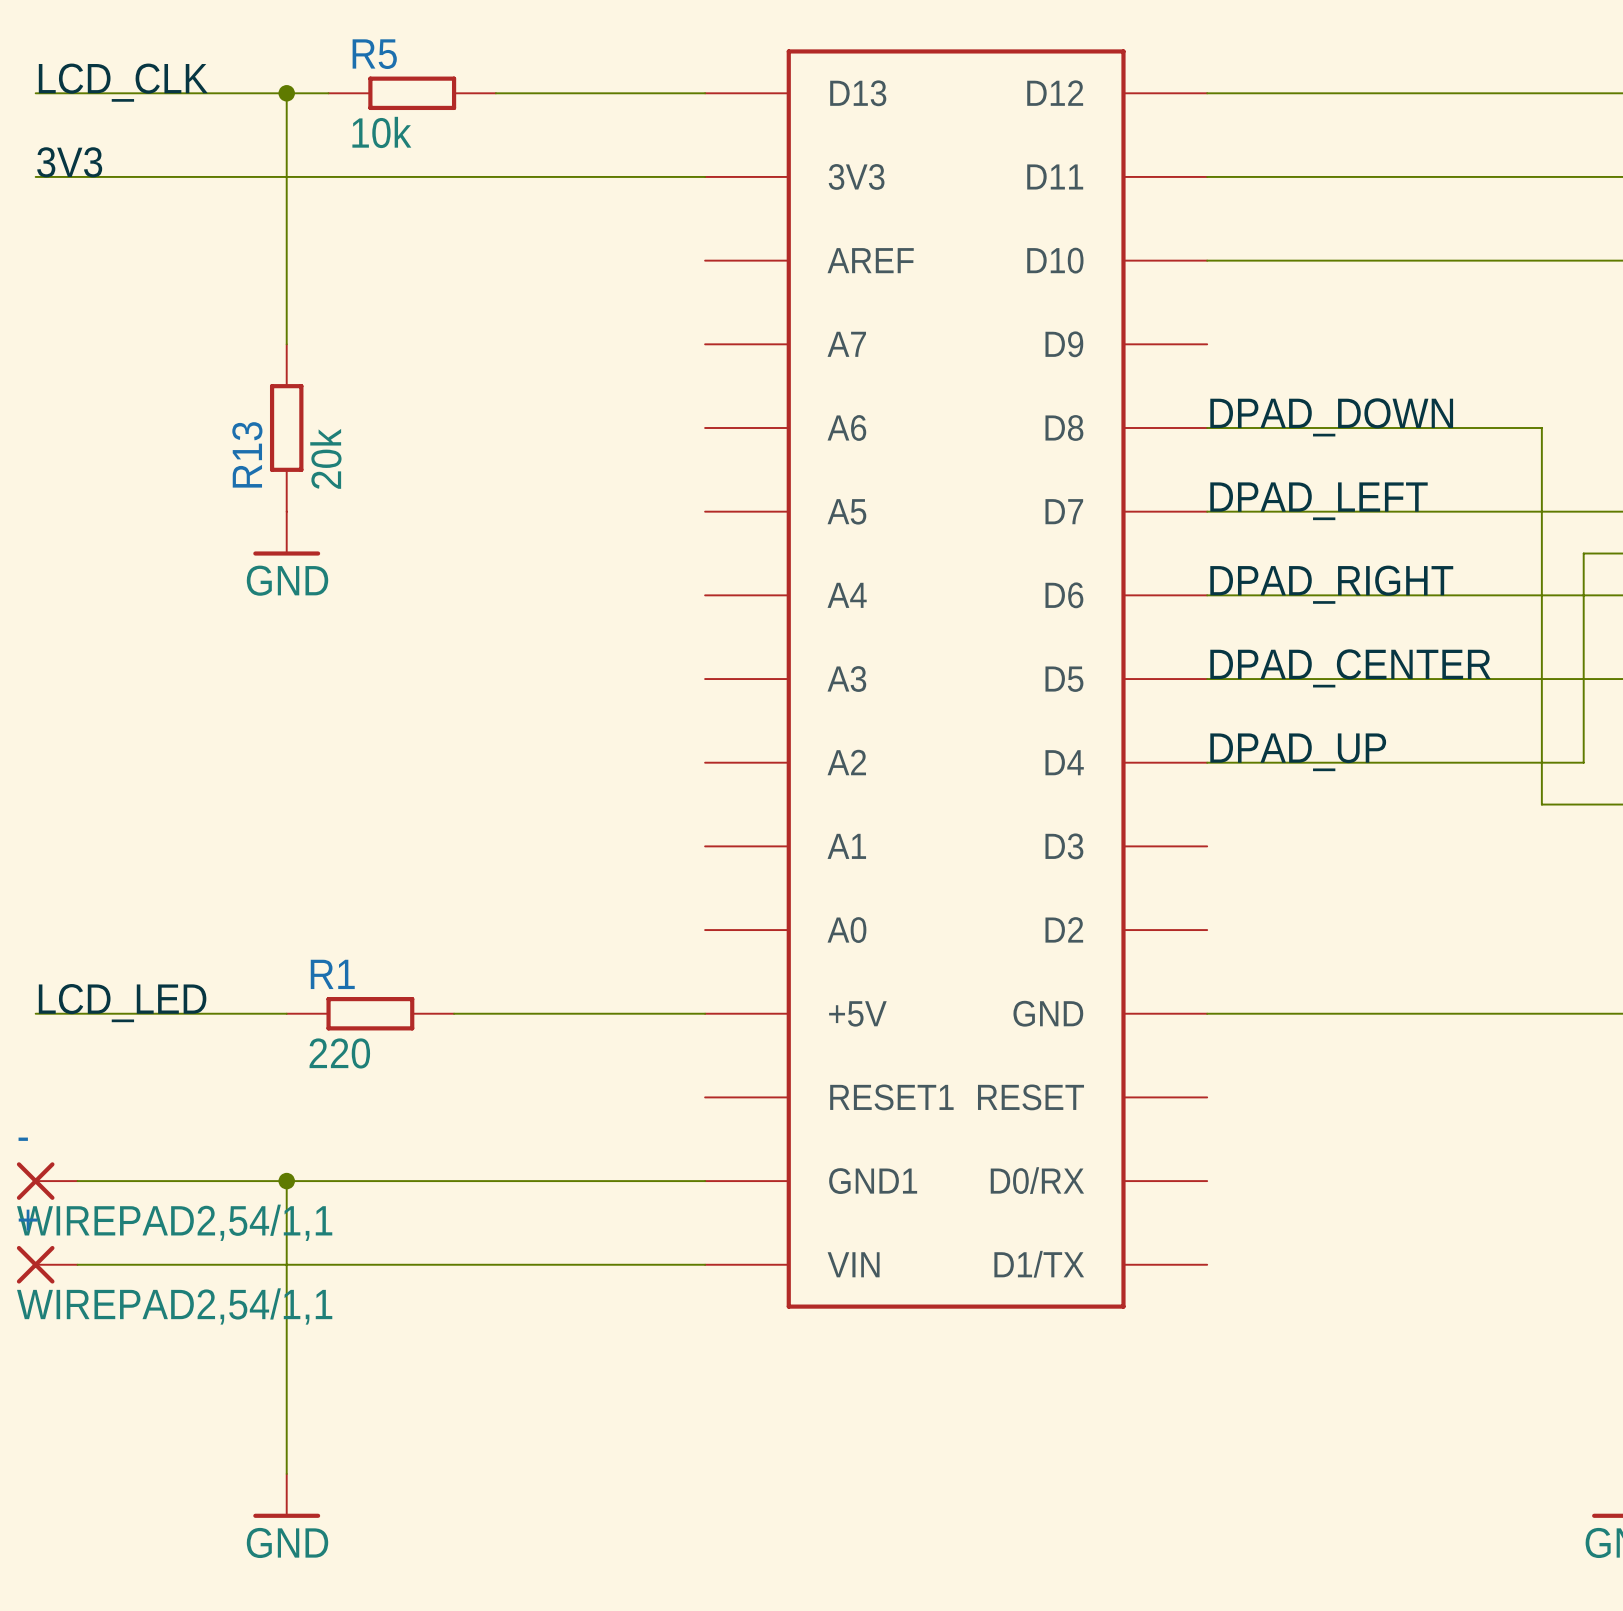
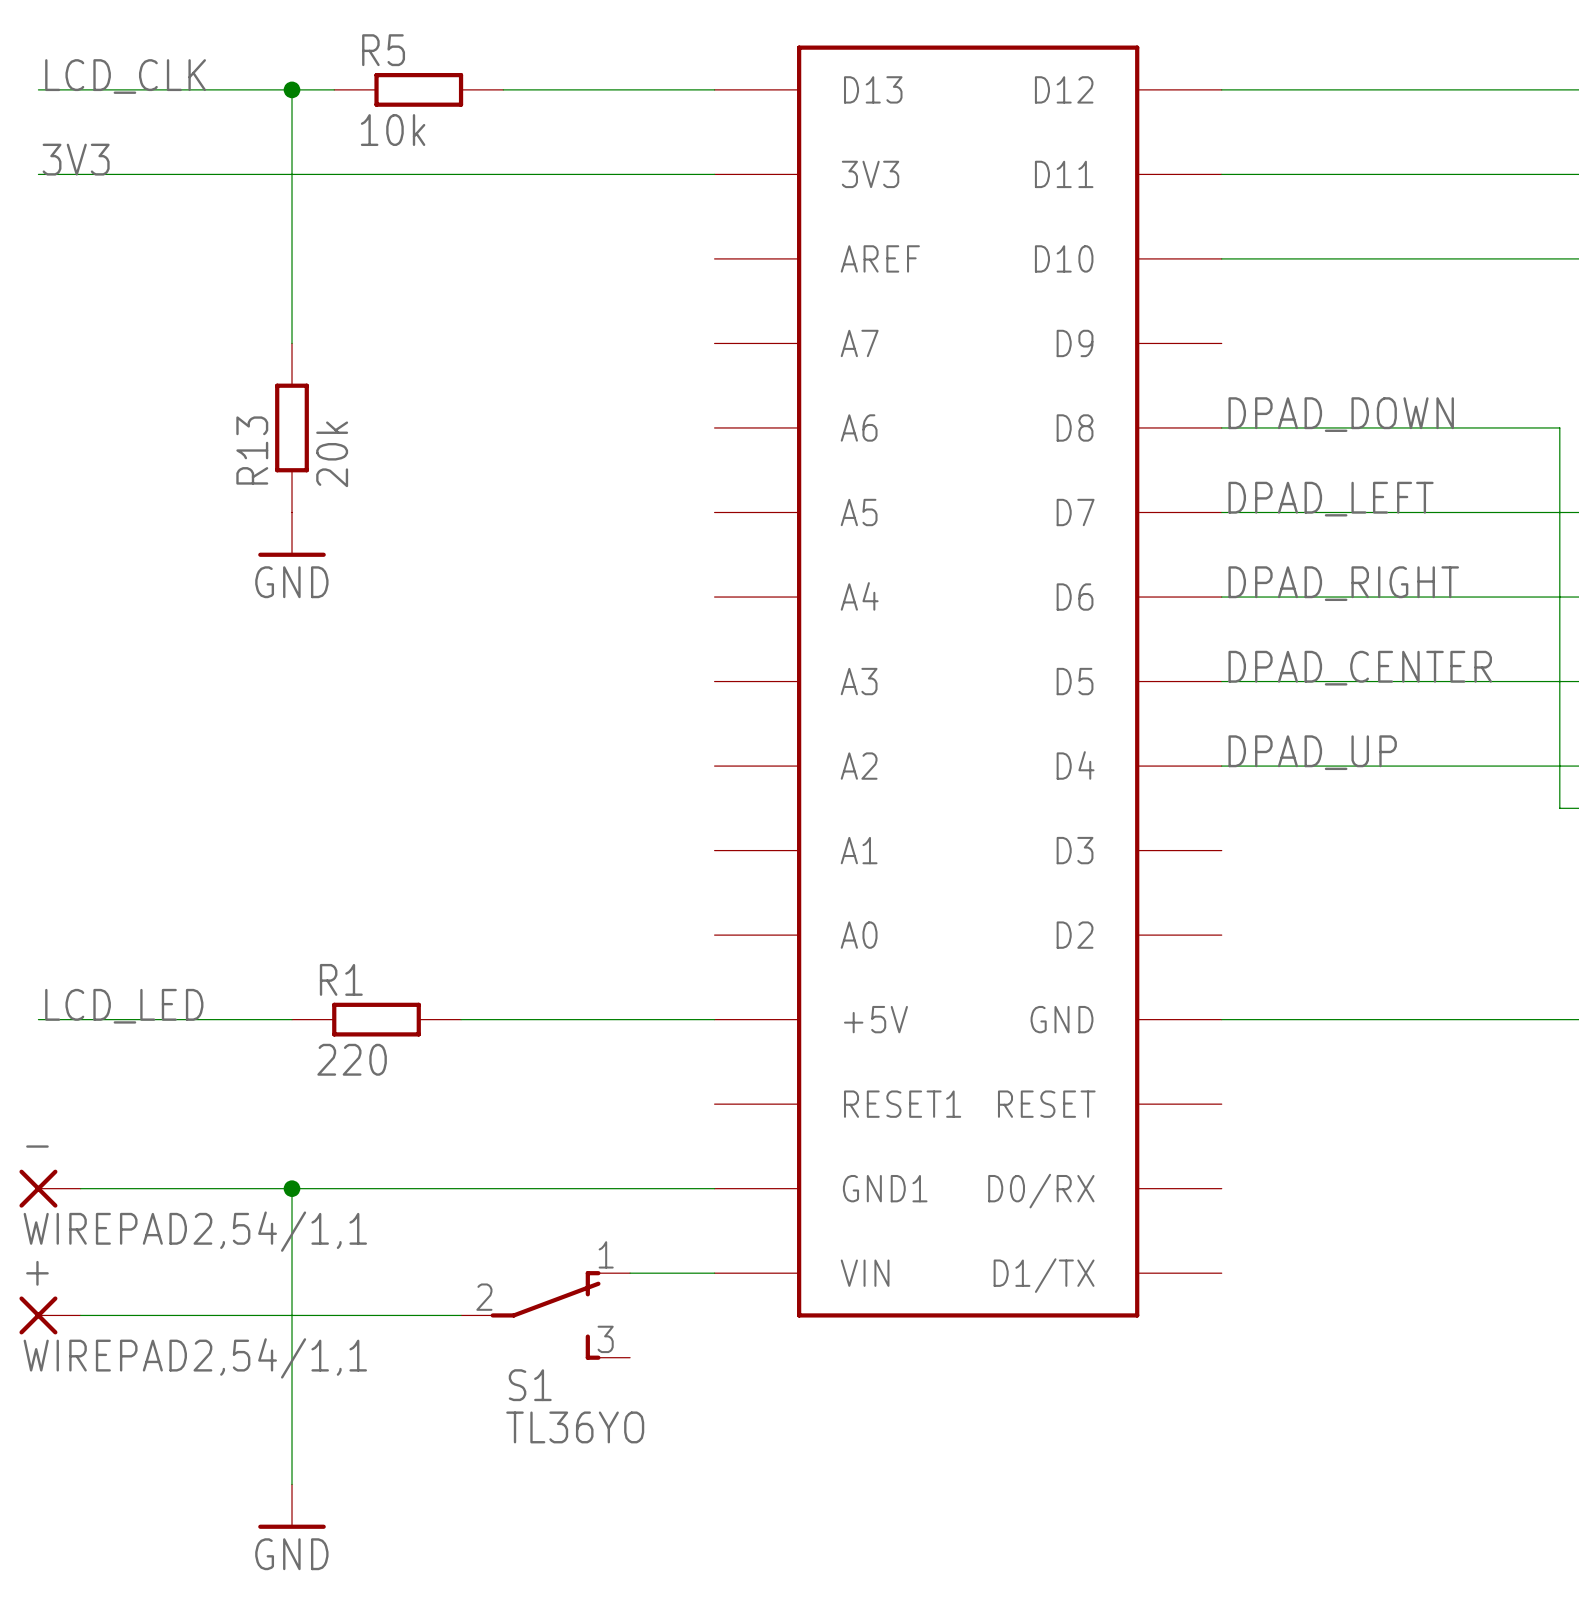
part position: (47, 1264) -> (50, 1315)
wire: (77, 1264) (621, 1264) -> none
wire: none -> (80, 1315) (461, 1315)
S1: none -> TL36YO (545, 1315)

